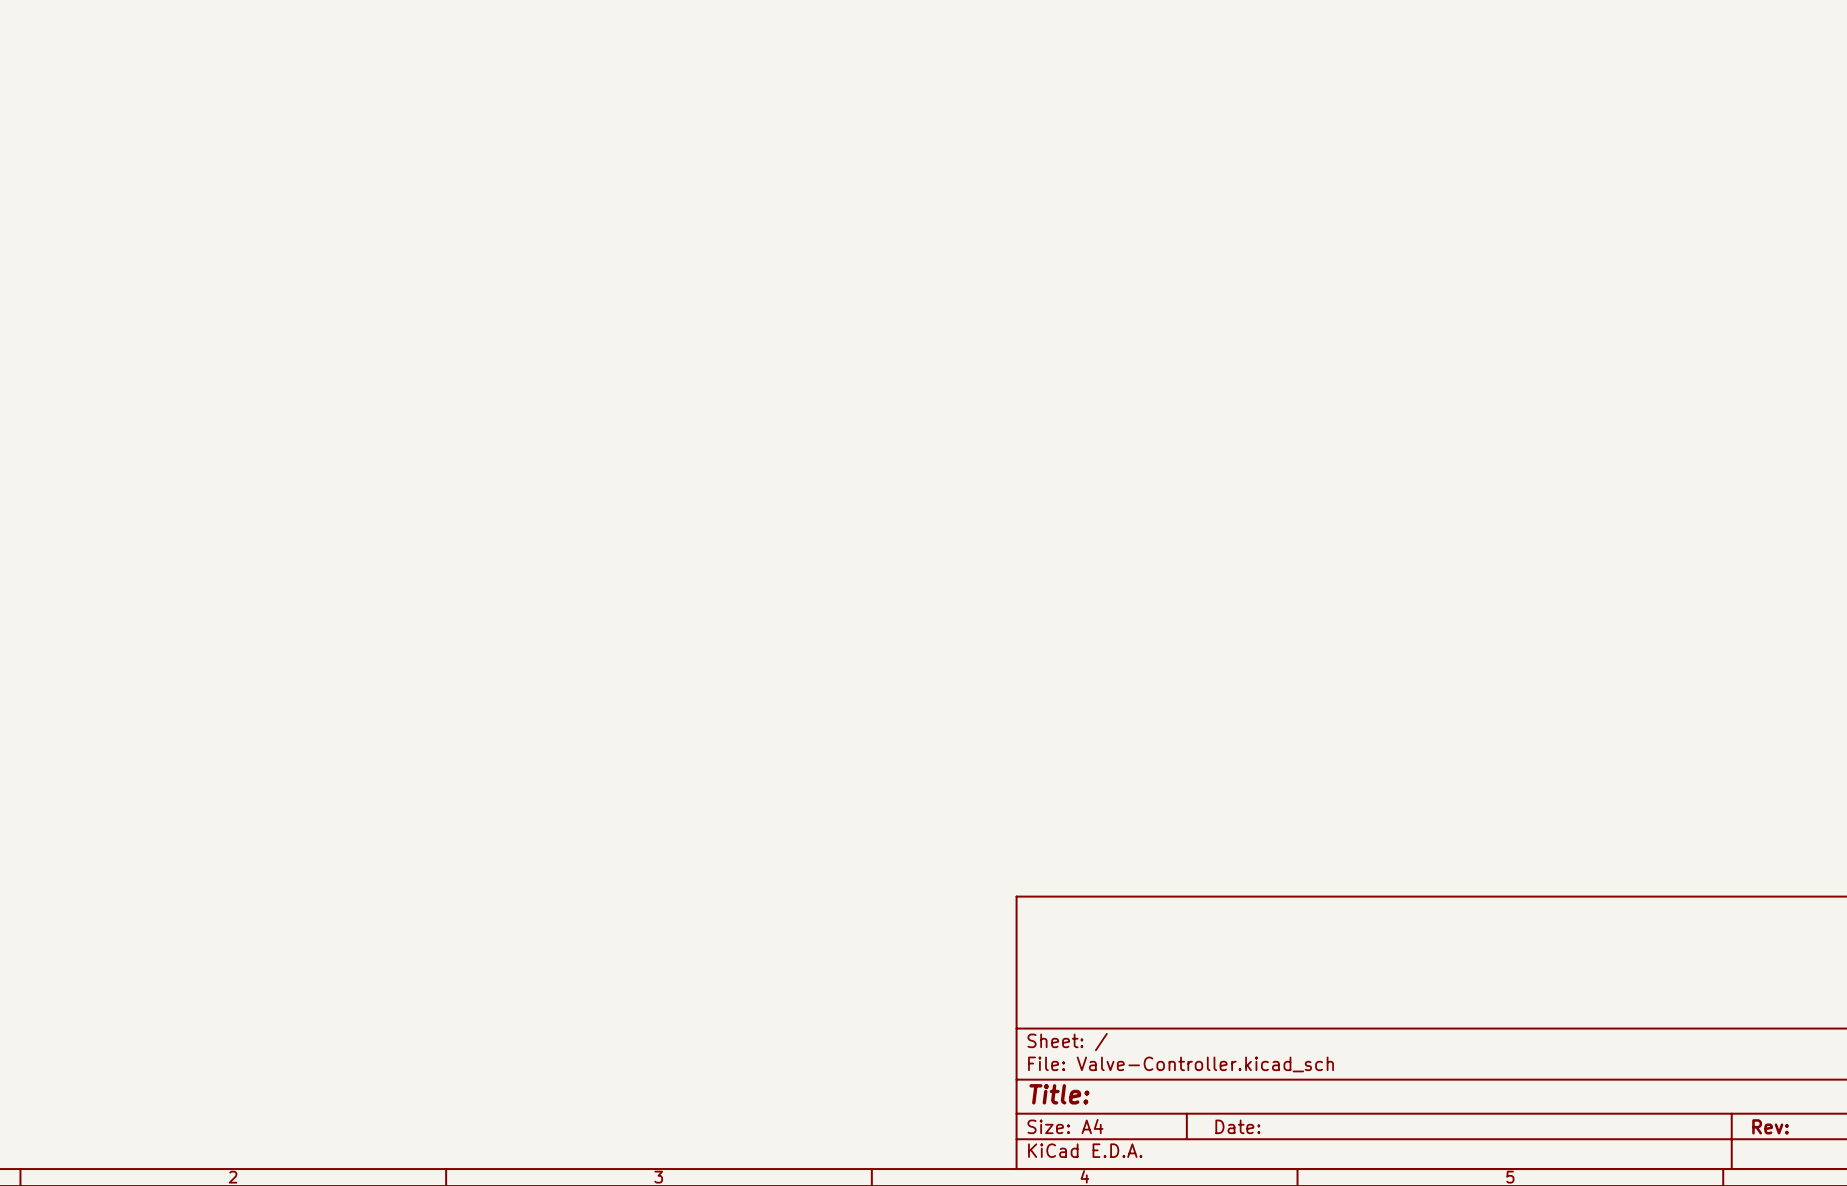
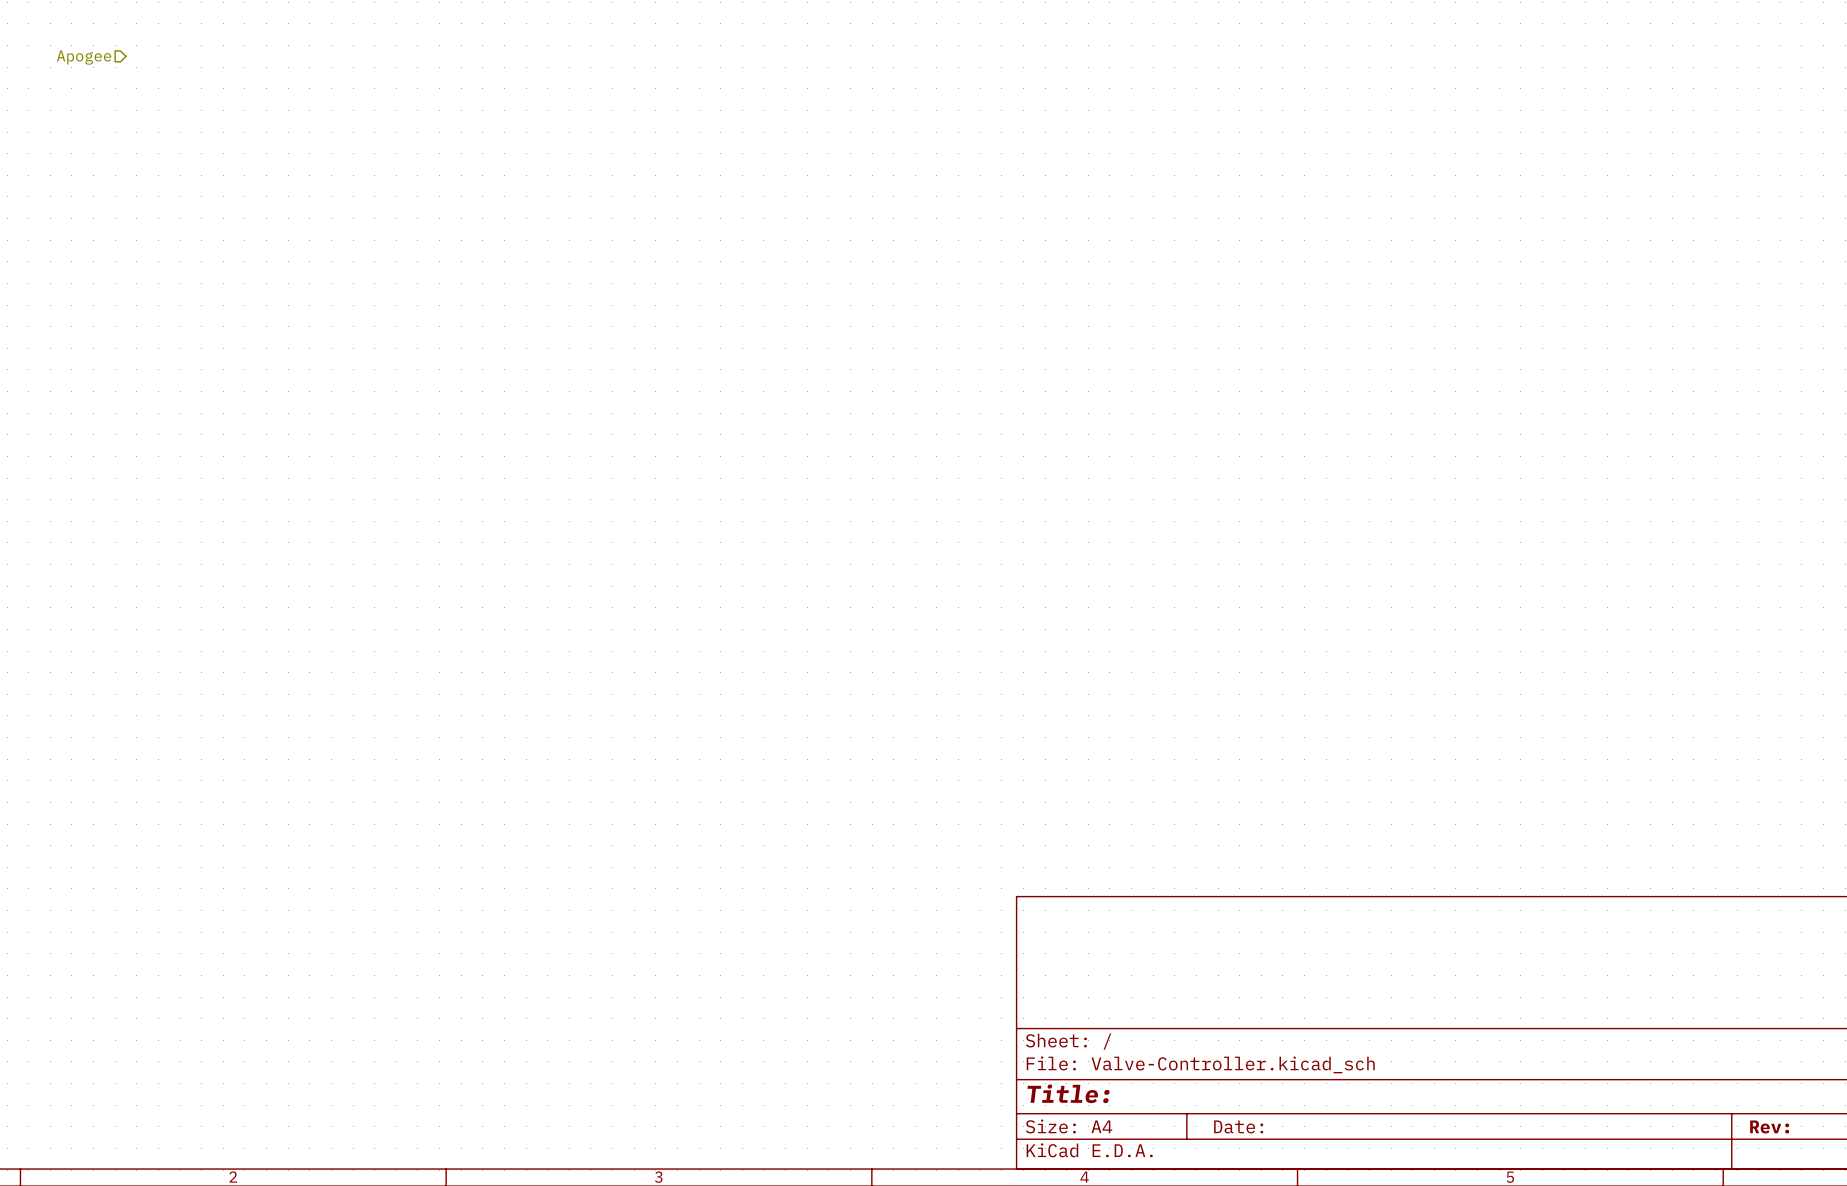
hierarchical label: none -> Apogee (84, 57)

